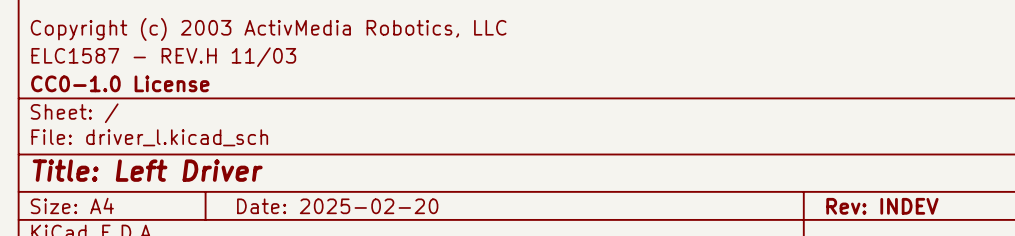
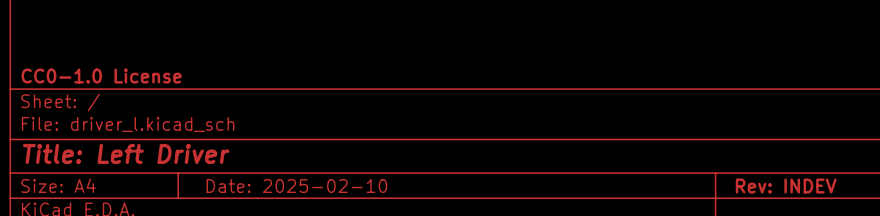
title block: Copyright (c) 2003 ActivMedia Robotics, LLC (268, 29) -> none
title block: ELC1587 - REV.H 11/03 (163, 57) -> none
title block: Date: 2025-02-20 (337, 206) -> Date: 2025-02-10 (296, 186)

